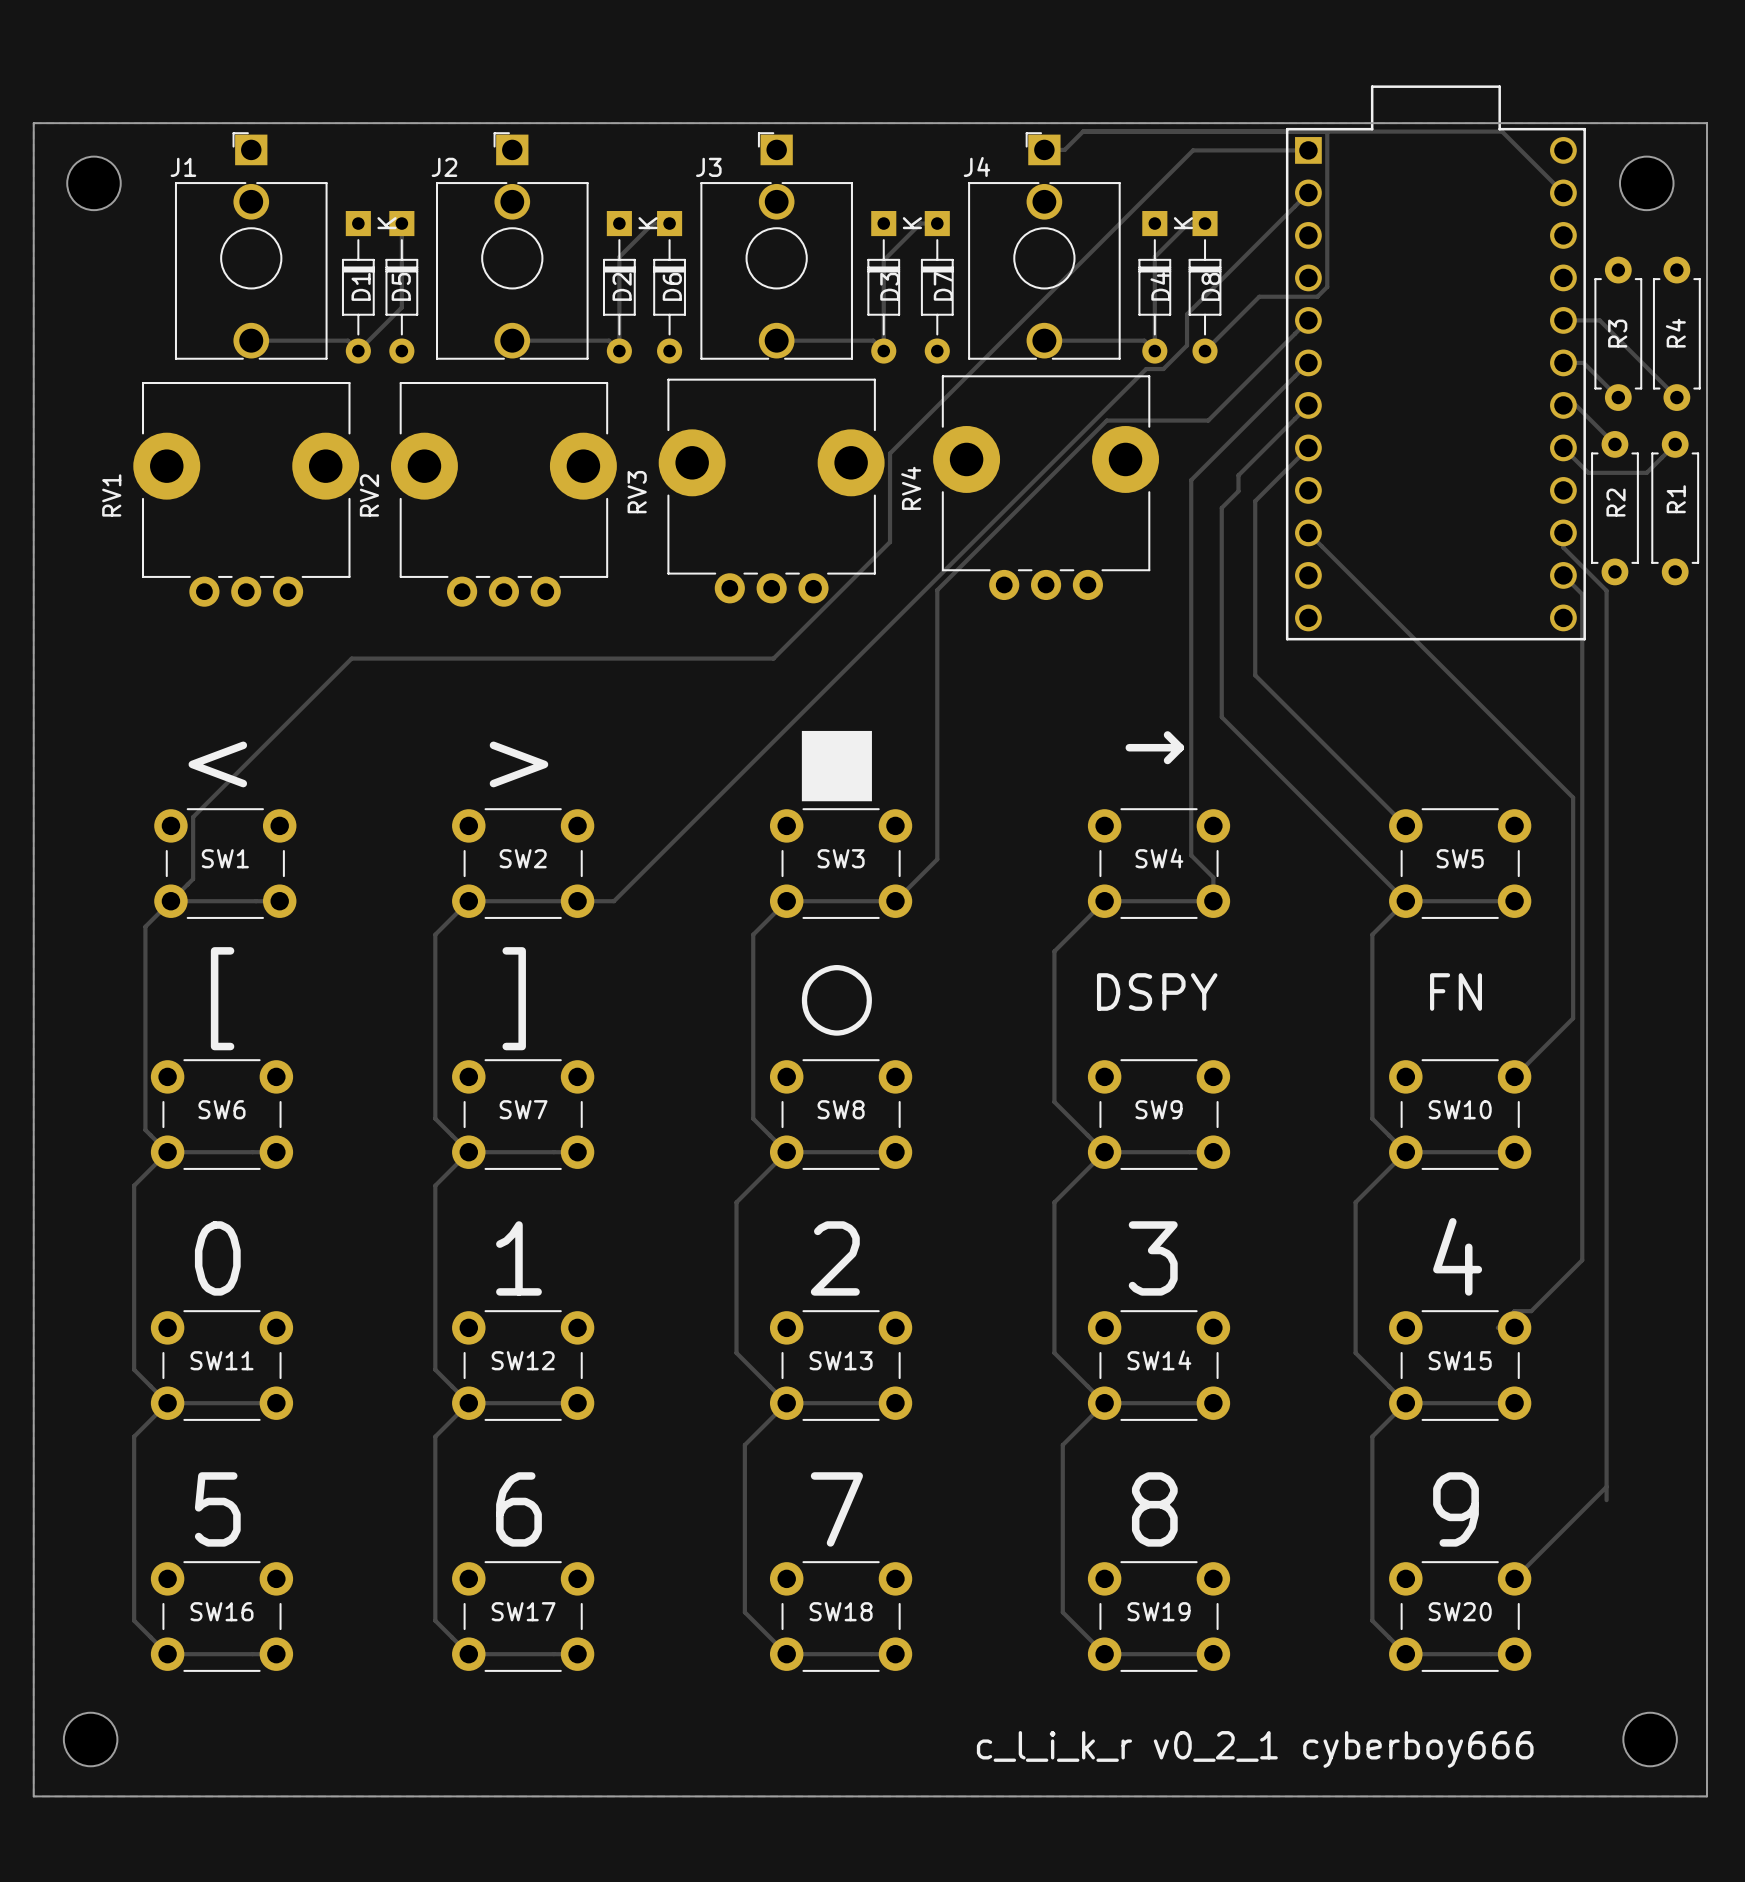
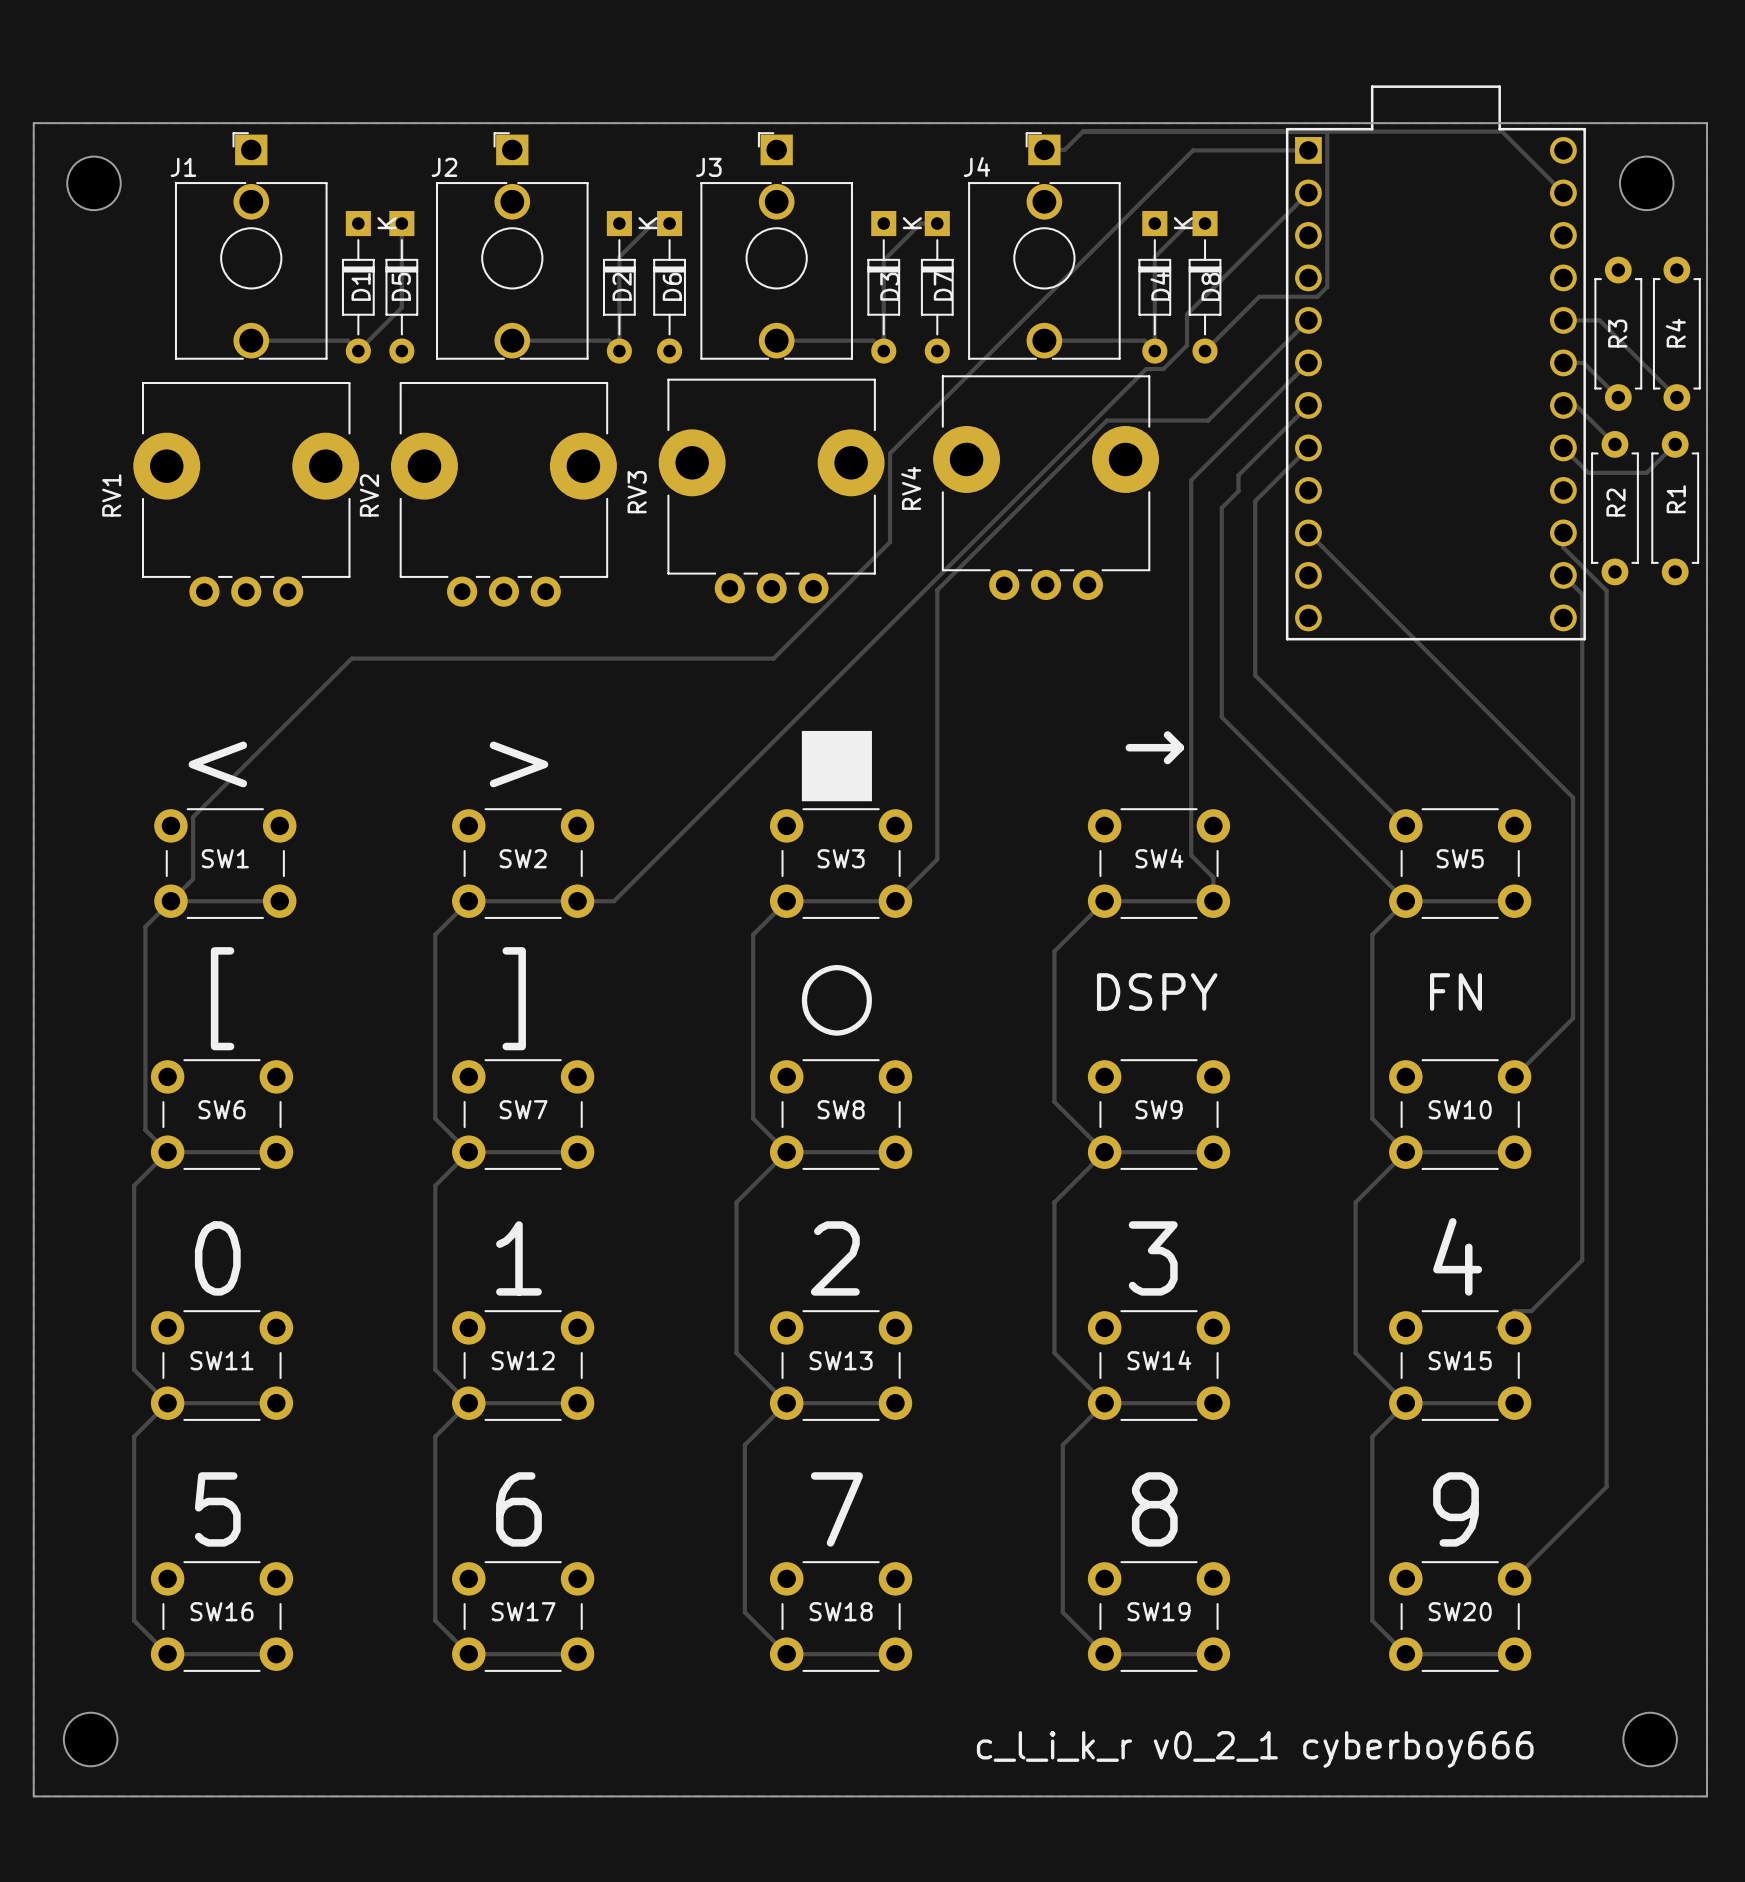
track: (1606, 1486) (1606, 1500) -> none

